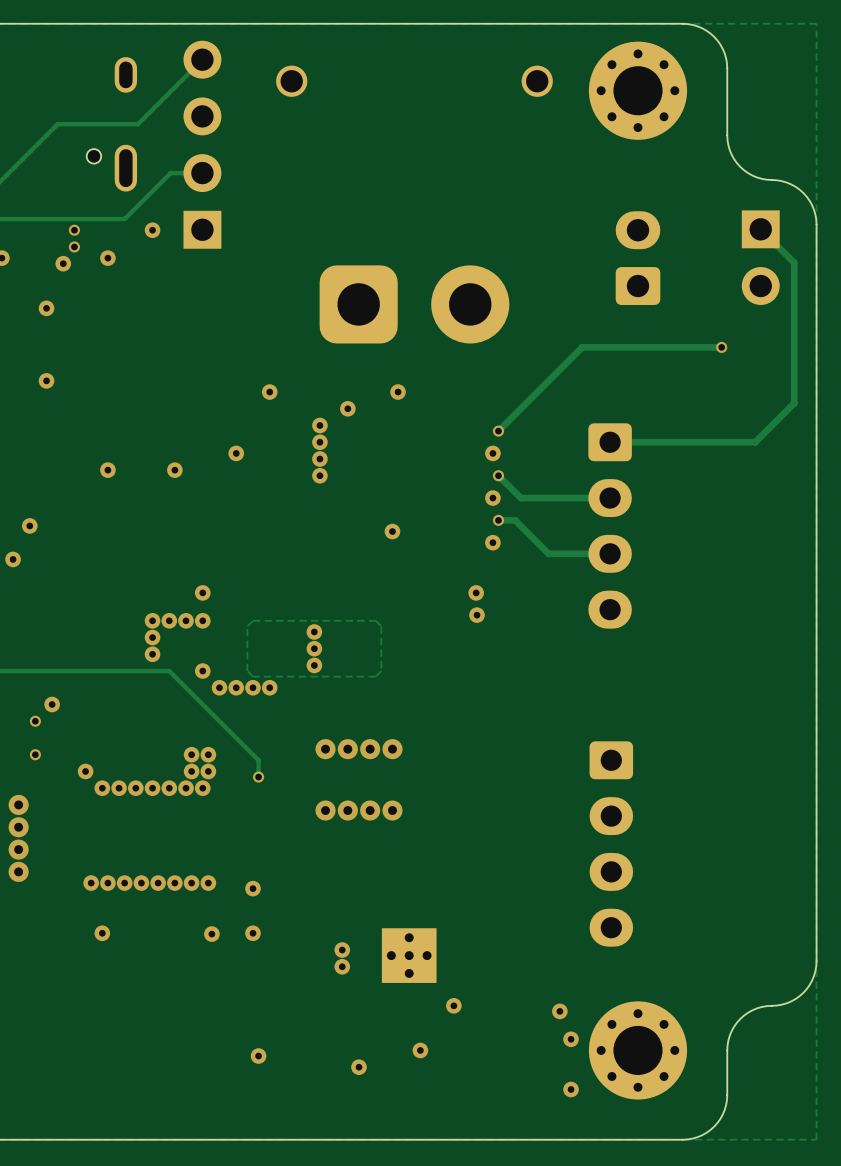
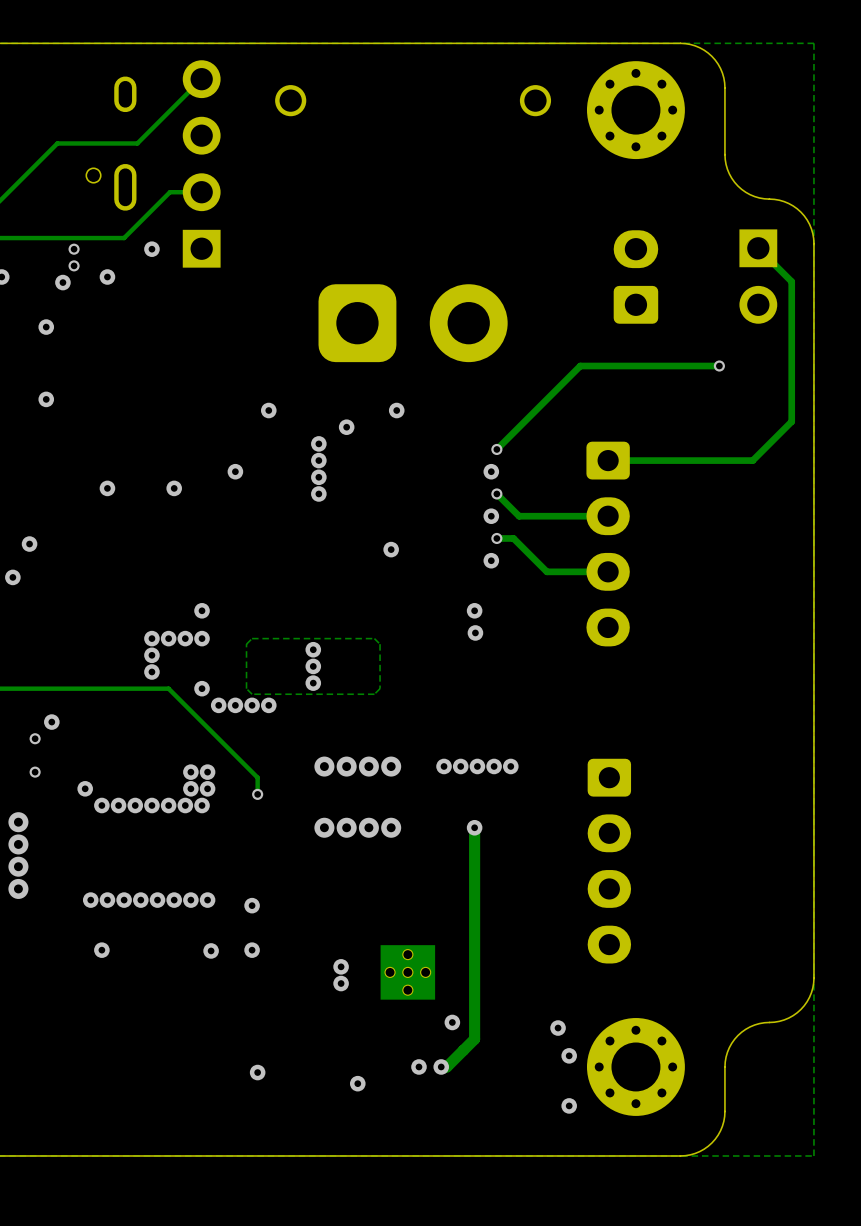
via: none -> (444, 766)
via: none -> (460, 766)
via: none -> (477, 766)
via: none -> (494, 766)
via: none -> (510, 766)
track: none -> (474, 827) (474, 1039) (446, 1066) (441, 1066)
via: none -> (474, 827)
via: none -> (441, 1066)

